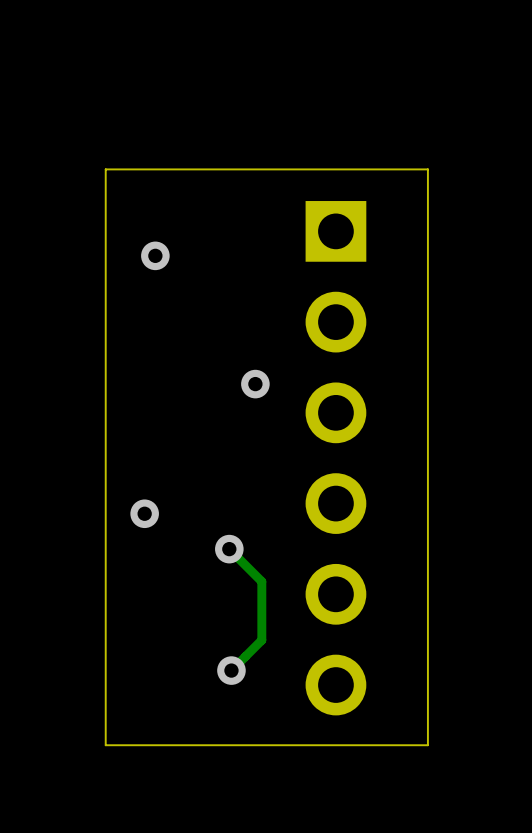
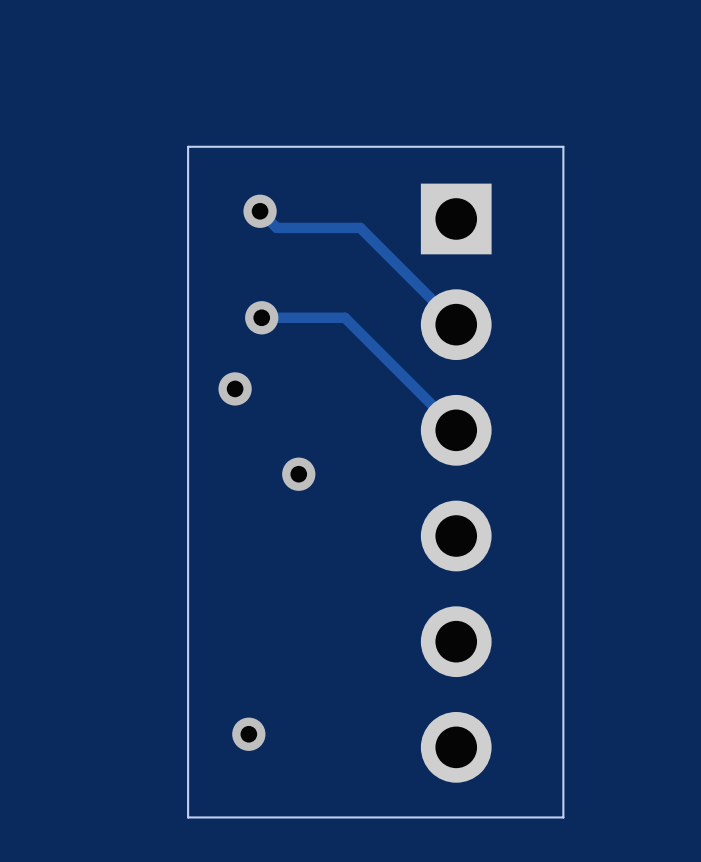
track: none -> (260, 211) (276, 227) (360, 227) (456, 324)
via: none -> (260, 211)
via: (155, 255) -> none
track: none -> (261, 317) (344, 317) (456, 428)
via: none -> (261, 317)
via: none -> (235, 388)
via: (255, 384) -> none
via: none -> (298, 474)
via: (144, 513) -> none
track: (229, 549) (261, 581) (261, 640) (231, 670) -> none
via: (229, 549) -> none
via: (231, 670) -> none
via: none -> (248, 734)

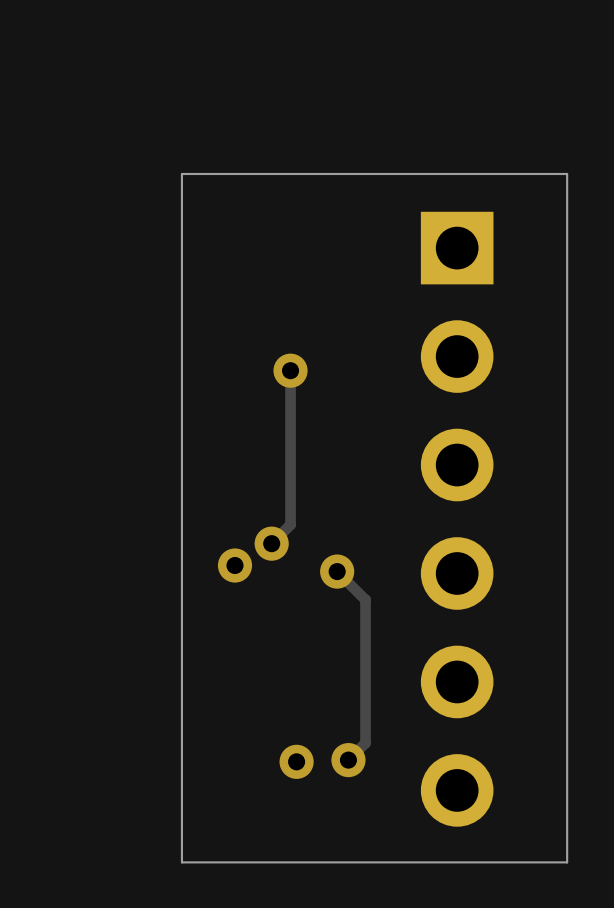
track: (260, 211) (276, 227) (360, 227) (456, 324) -> none
via: (260, 211) -> none
track: (261, 317) (344, 317) (456, 428) -> none
via position: (261, 317) -> (290, 370)
track: none -> (290, 370) (290, 524) (271, 543)
via: (235, 388) -> none
via position: (298, 474) -> (271, 543)
via: none -> (234, 565)
track: none -> (337, 571) (365, 599) (365, 743) (348, 760)
via: none -> (337, 571)
via: none -> (348, 760)
via: none -> (296, 761)
via: (248, 734) -> none

